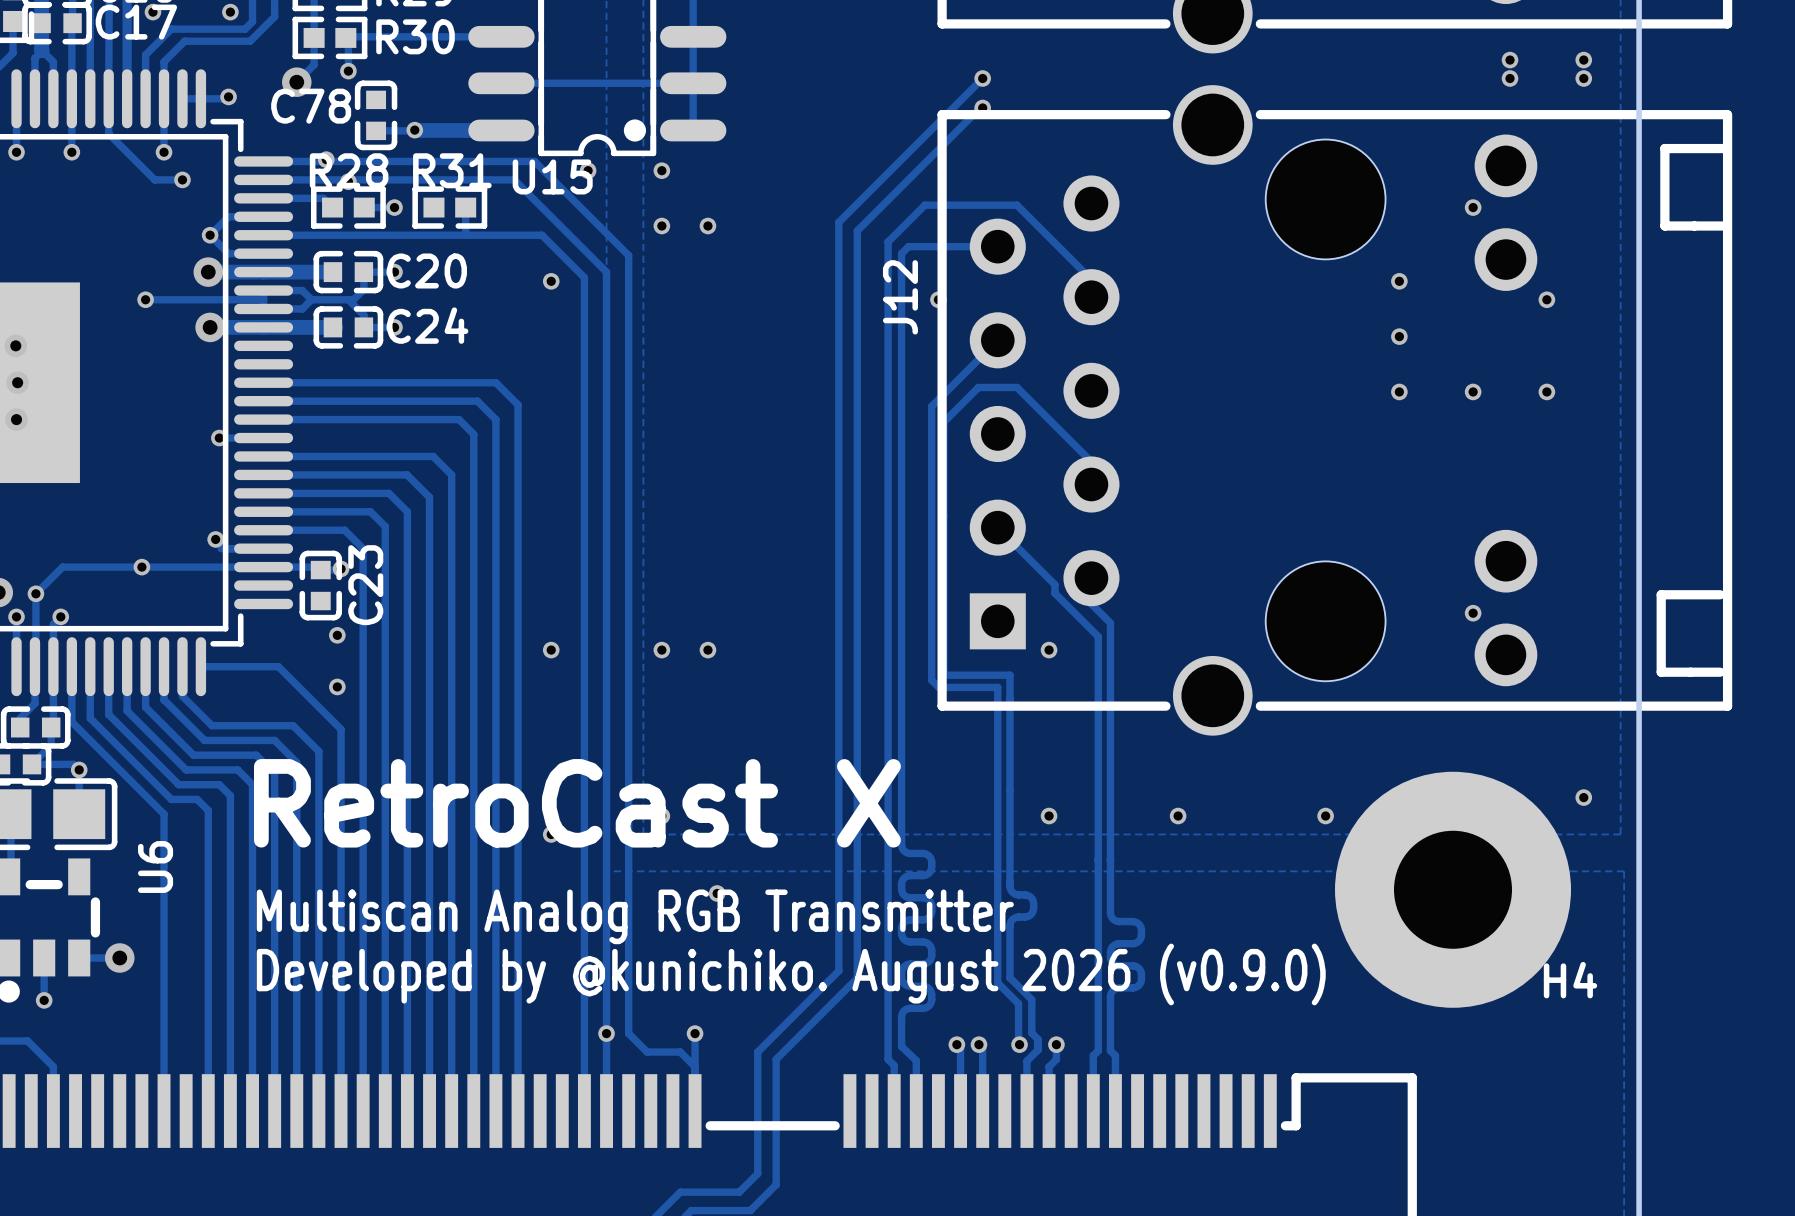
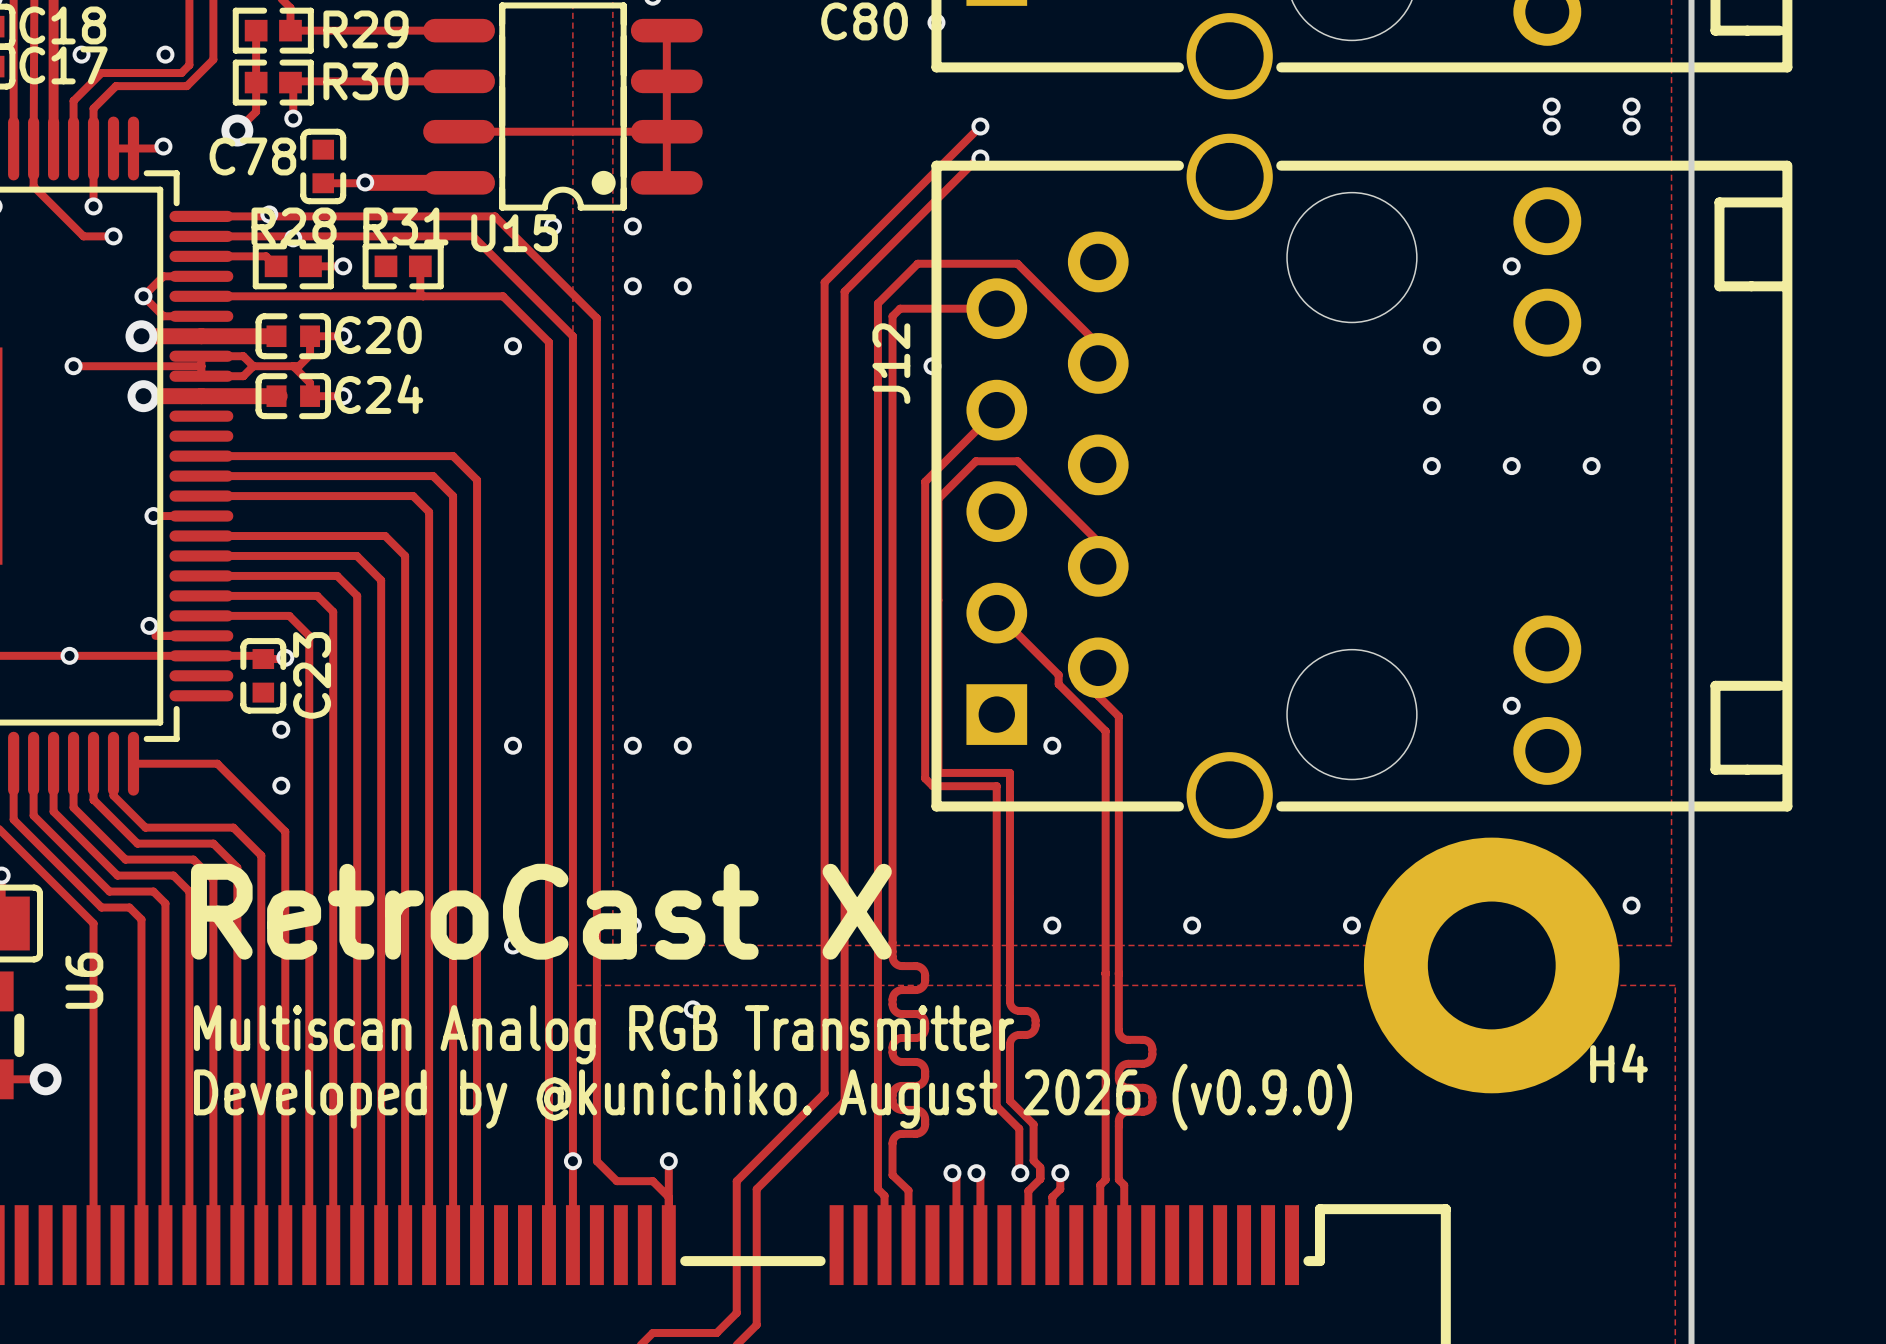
H4 position: (1453, 889) -> (1491, 965)

